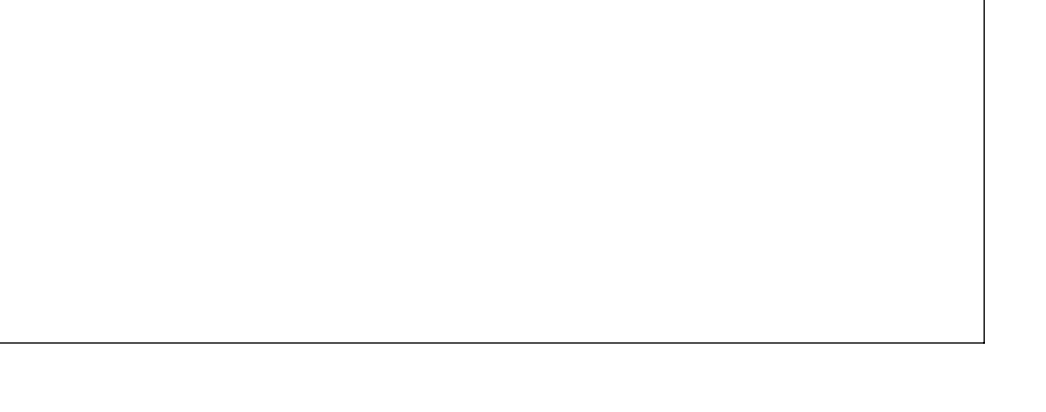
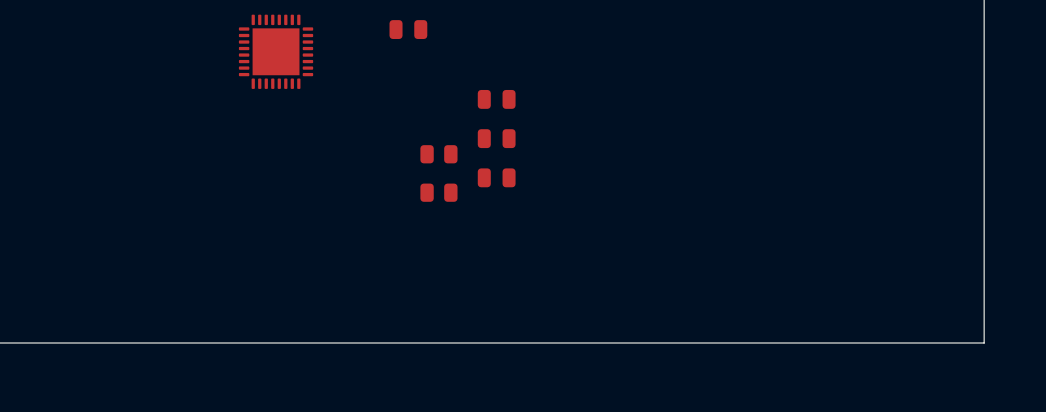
part: none -> (408, 29)
part: none -> (276, 51)
part: none -> (496, 99)
part: none -> (496, 138)
part: none -> (438, 154)
part: none -> (496, 177)
part: none -> (438, 192)

